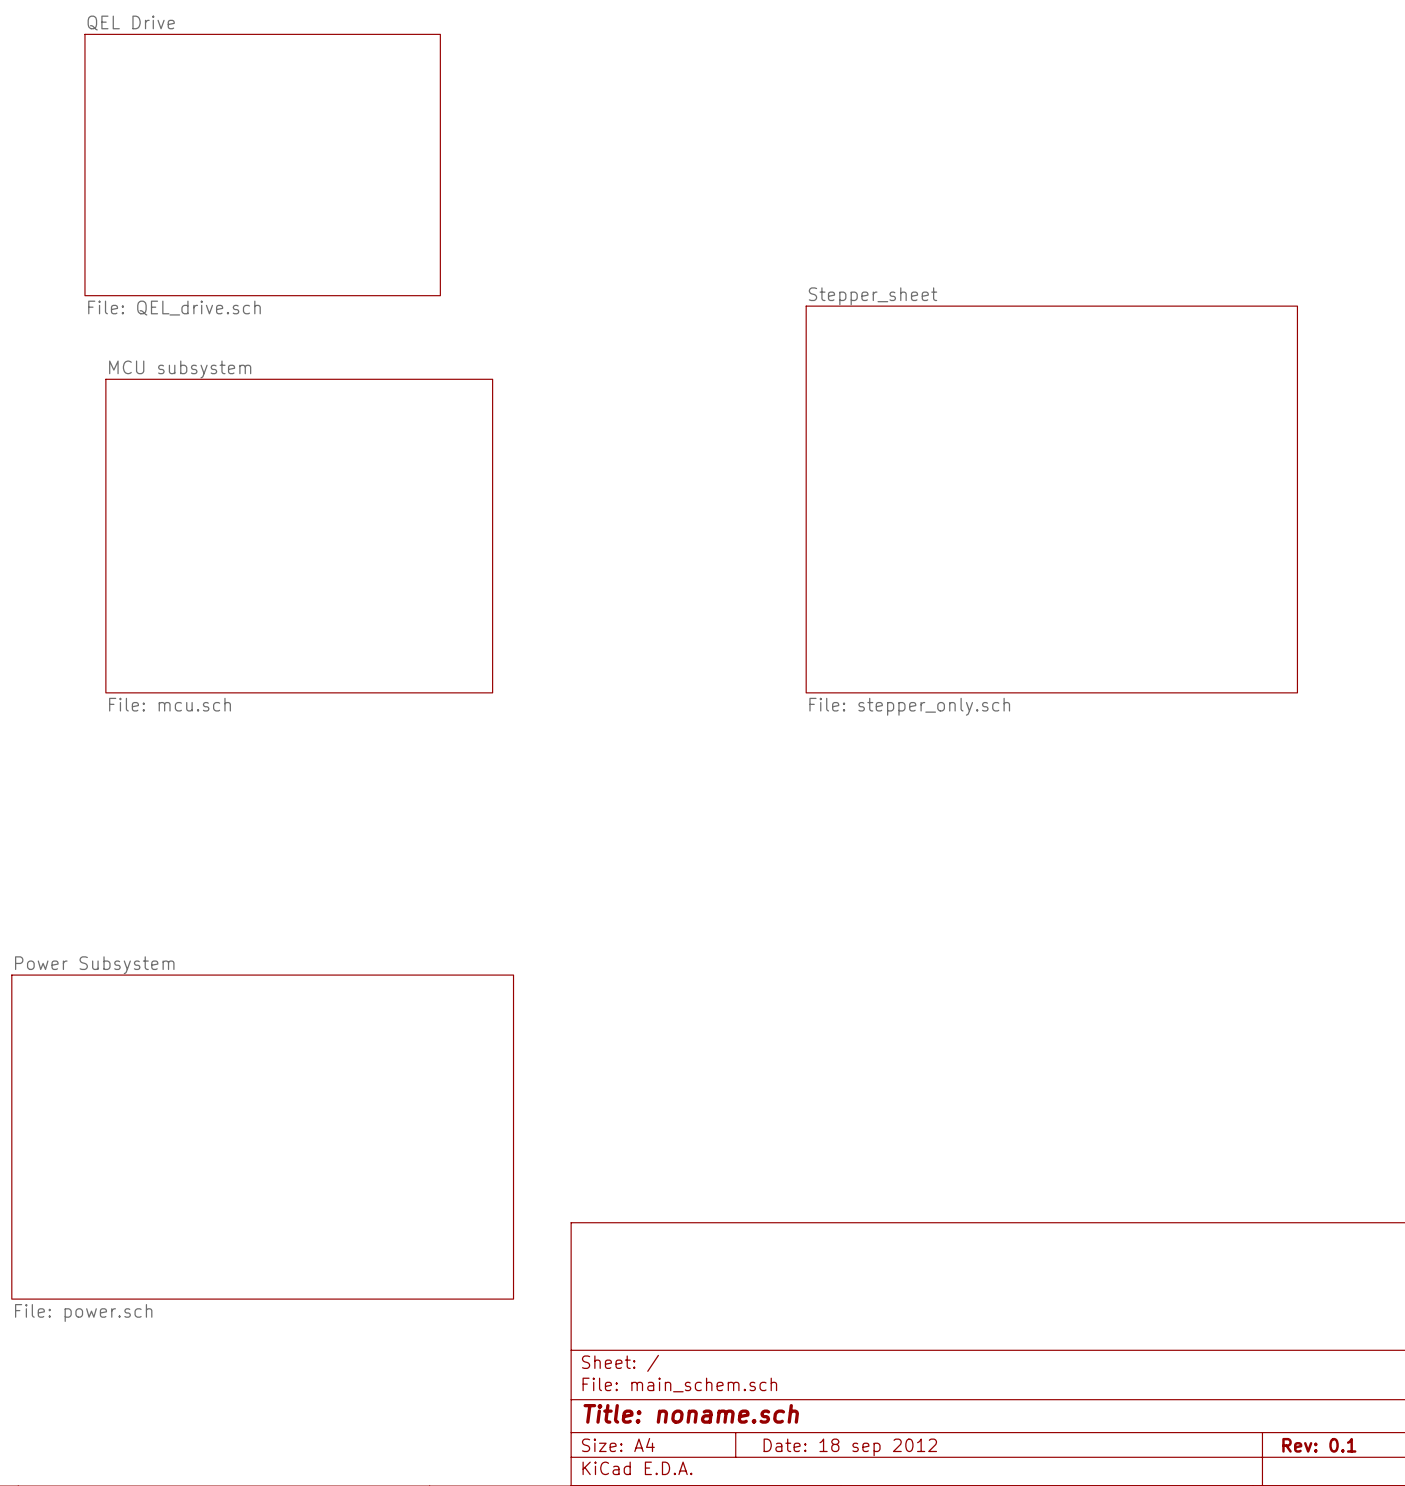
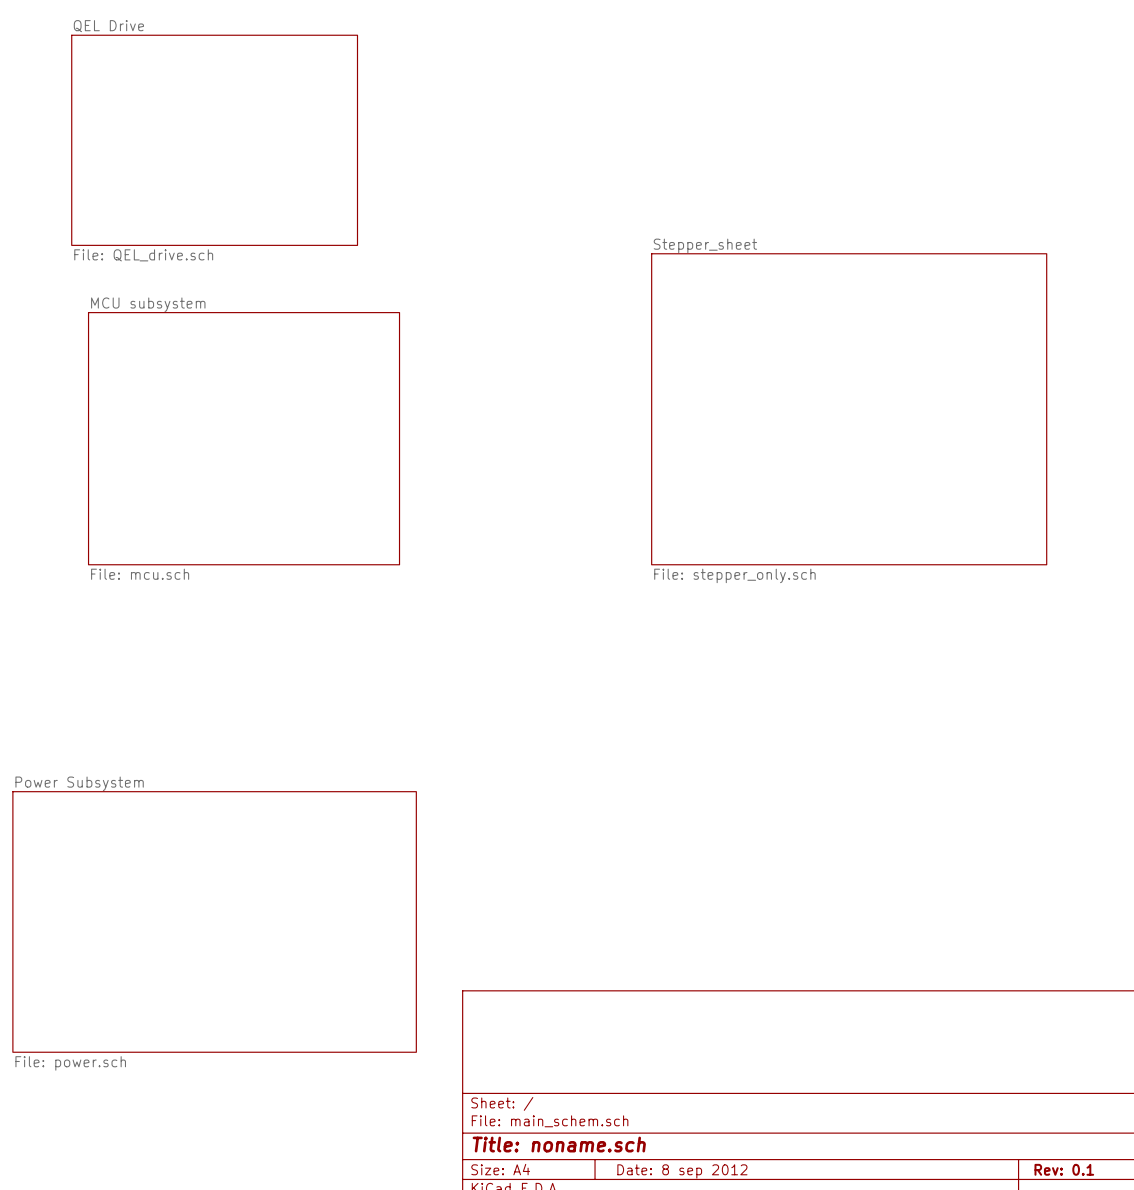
title block: Date: 18 sep 2012 (850, 1447) -> Date: 8 sep 2012 (682, 1171)

